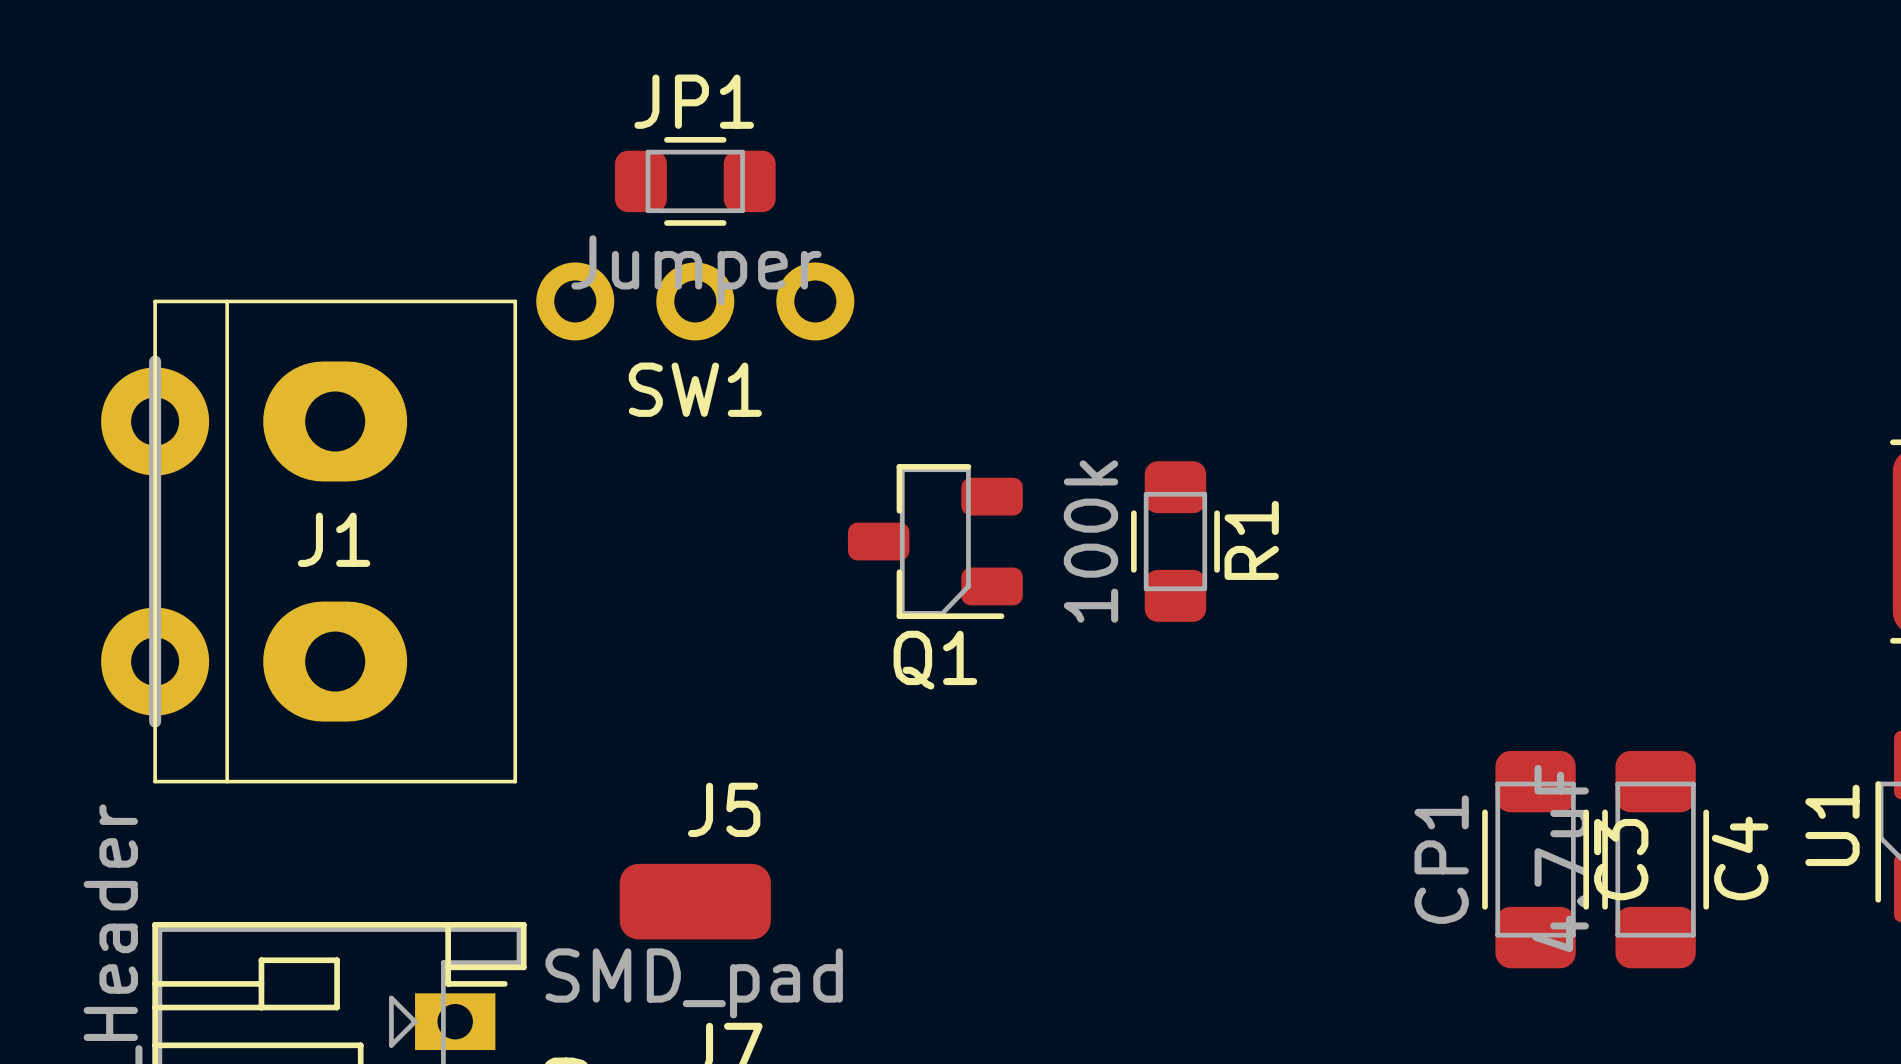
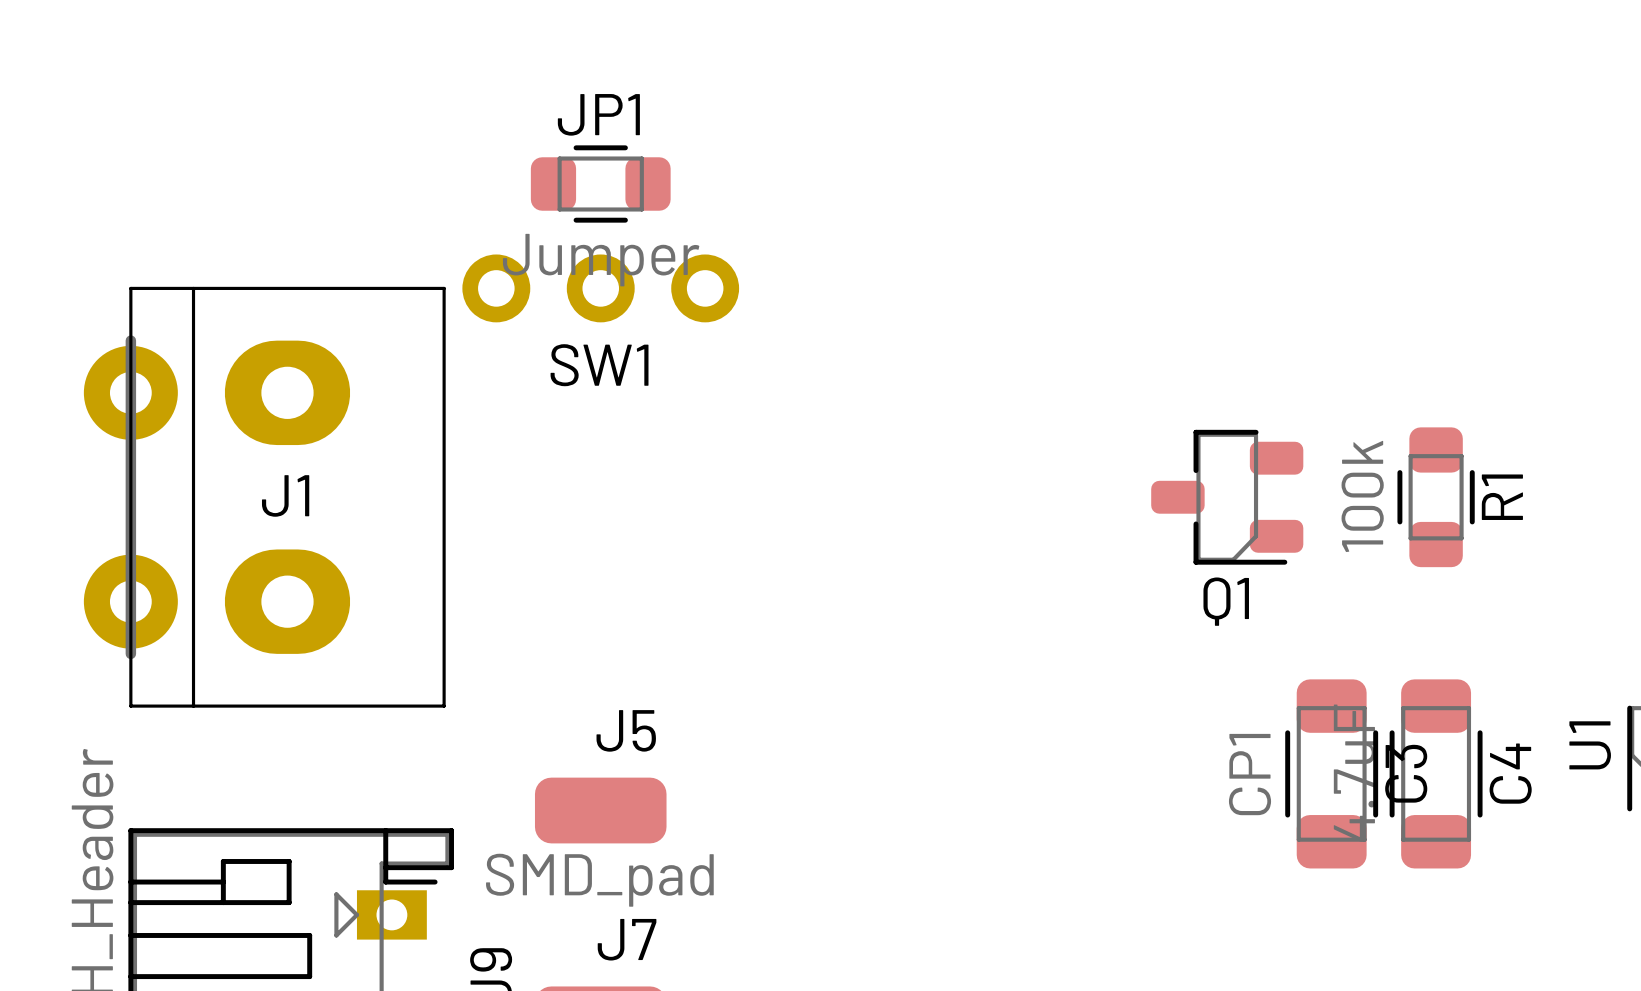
Q1 position: (935, 541) -> (1227, 497)
R1 position: (1175, 541) -> (1436, 497)

